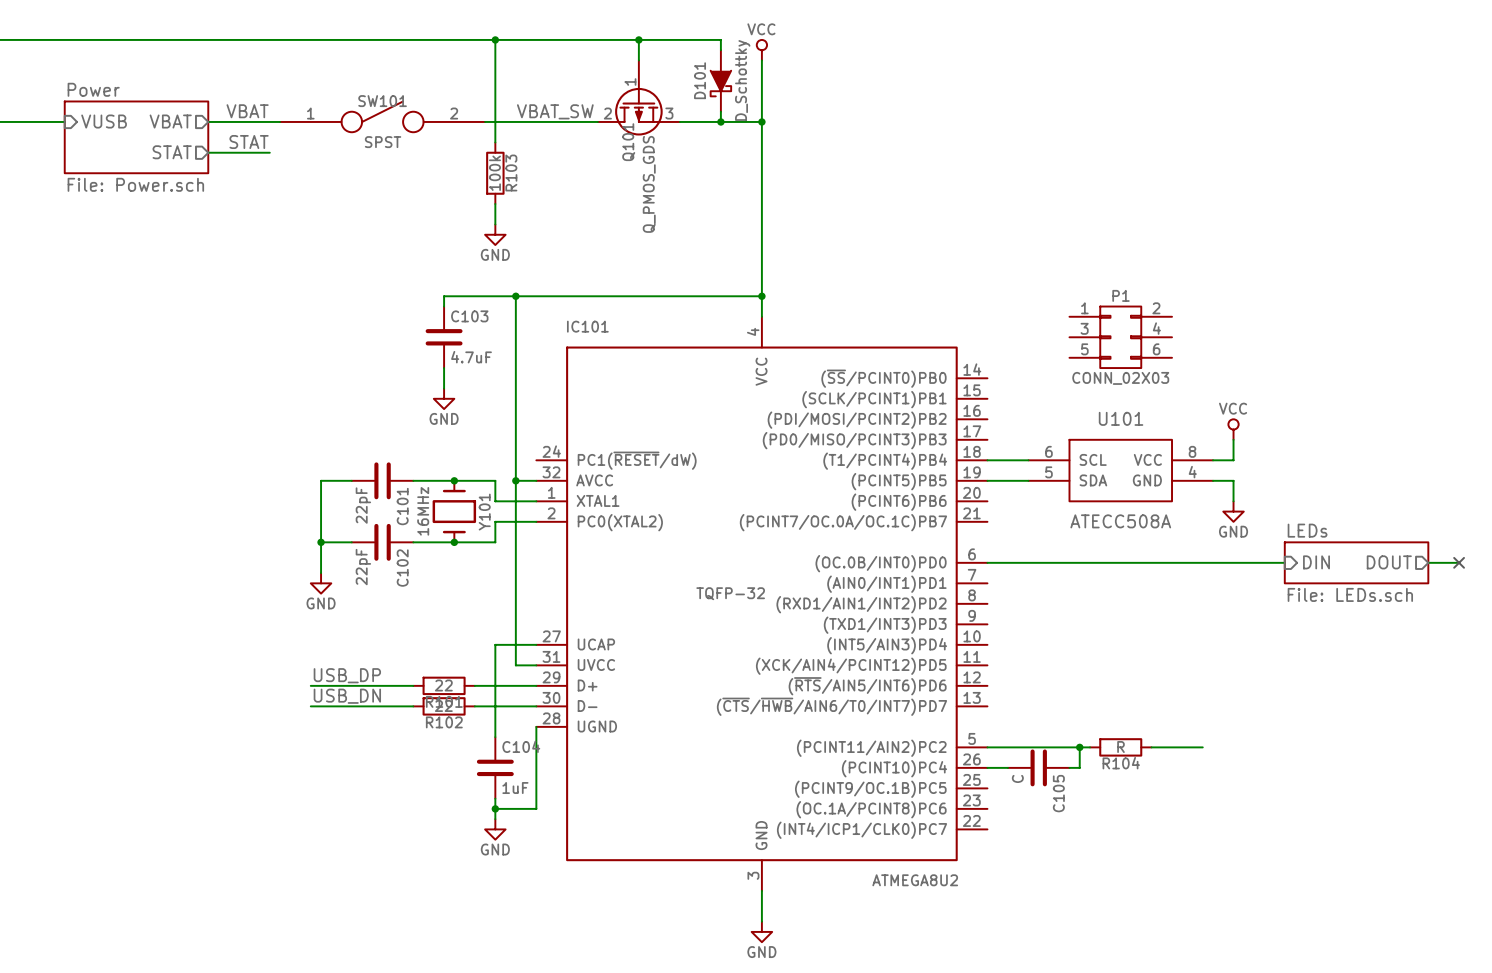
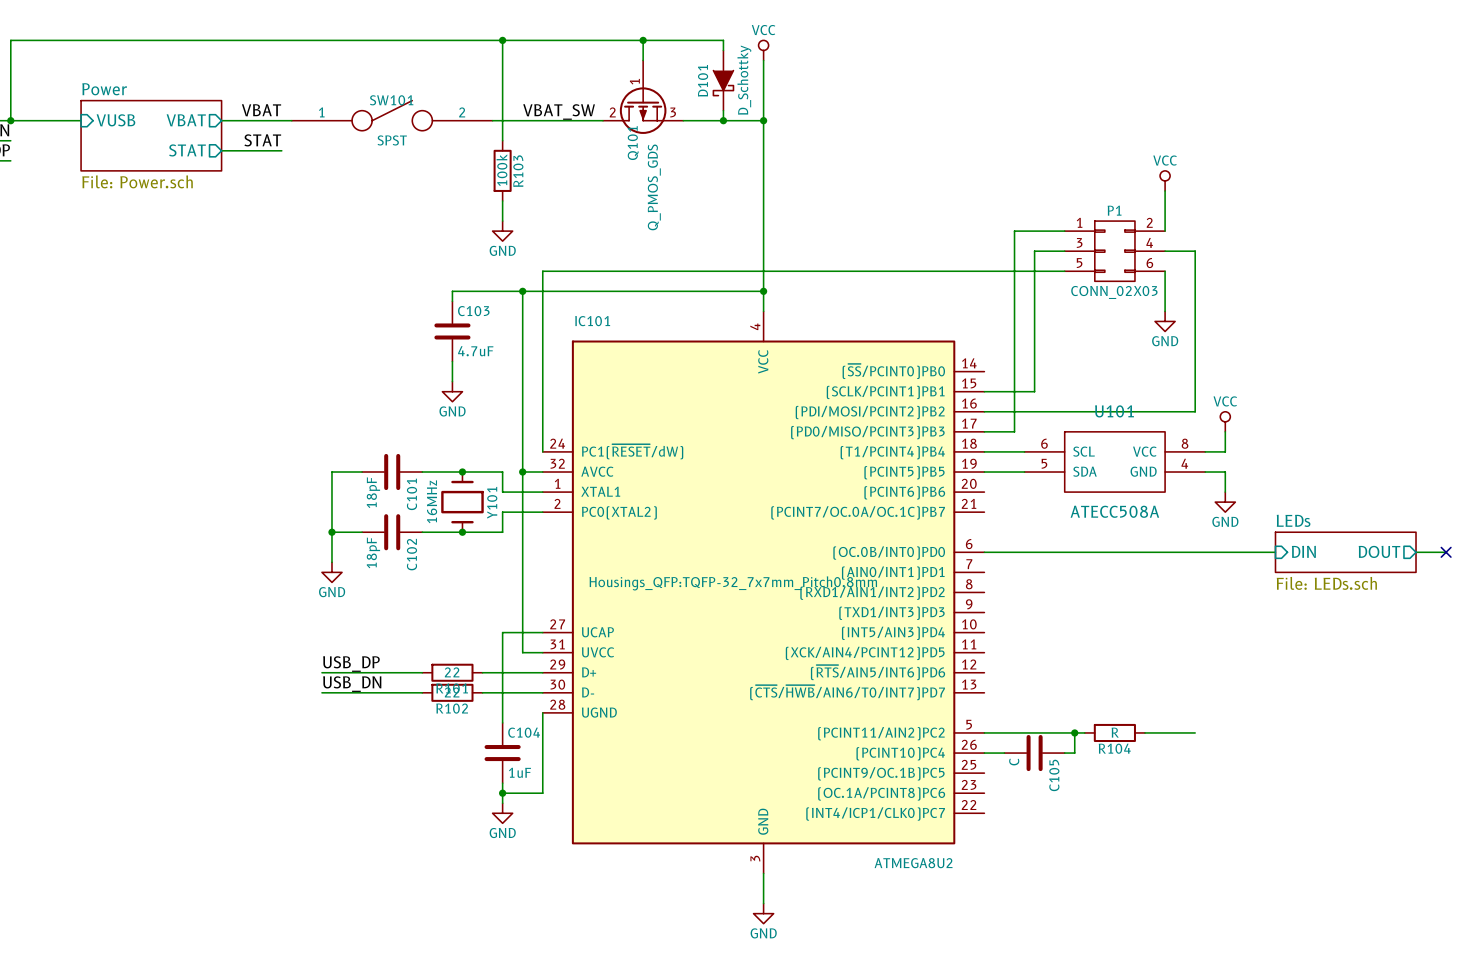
power symbol: none -> VCC (1165, 180)
wire: none -> (1165, 190) (1165, 231)
wire: none -> (1064, 231) (1014, 231) (1014, 431) (984, 431)
wire: none -> (1064, 251) (1034, 251) (1034, 391) (984, 391)
wire: none -> (1165, 251) (1195, 251) (1195, 411) (984, 411)
wire: none -> (1064, 271) (542, 271) (542, 451)
wire: none -> (1165, 271) (1165, 311)
power symbol: none -> GND (1165, 321)
P1 position: (1120, 337) -> (1114, 251)
C101 value: 22pF (363, 505) -> 18pF (373, 492)
C102 value: 22pF (363, 567) -> 18pF (373, 552)
IC101 text: TQFP-32 (730, 593) -> Housings_QFP:TQFP-32_7x7mm_Pitch0.8mm (733, 583)

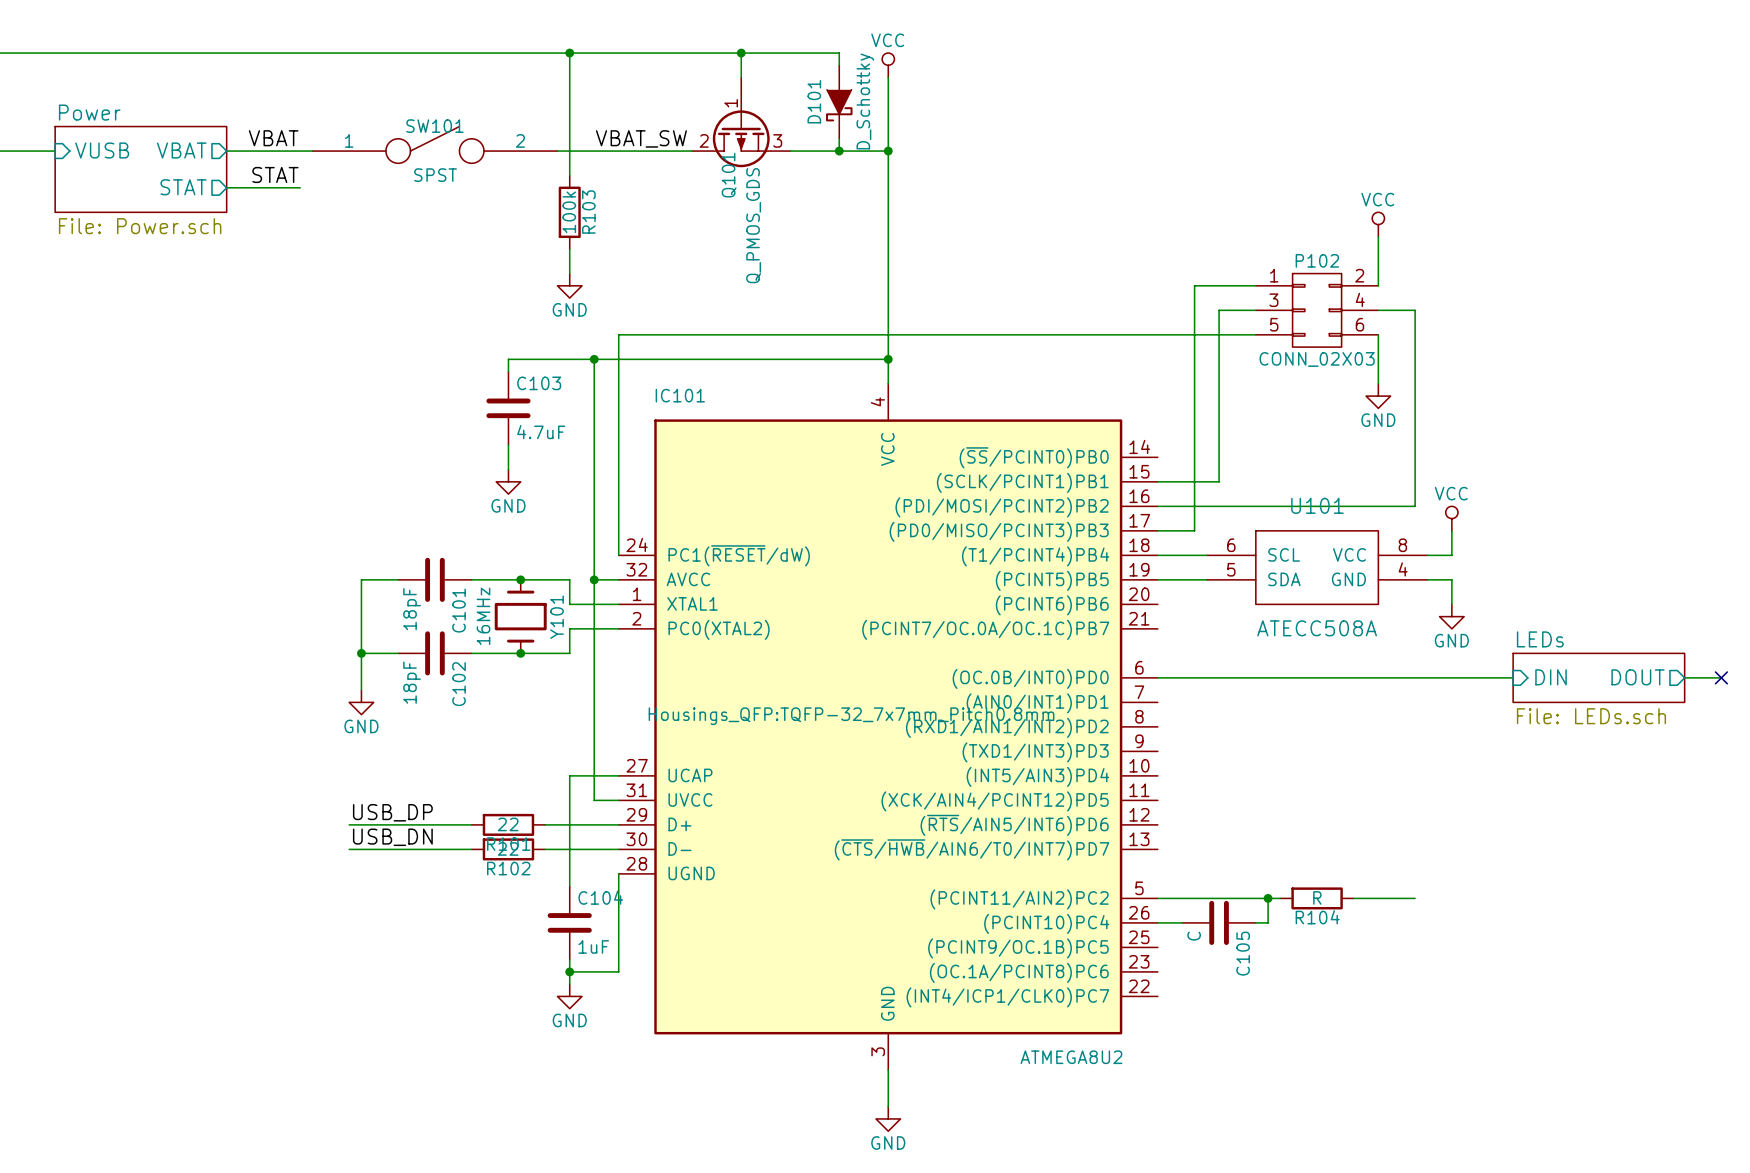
P1 name: P1 (1114, 210) -> P102 (1317, 260)

